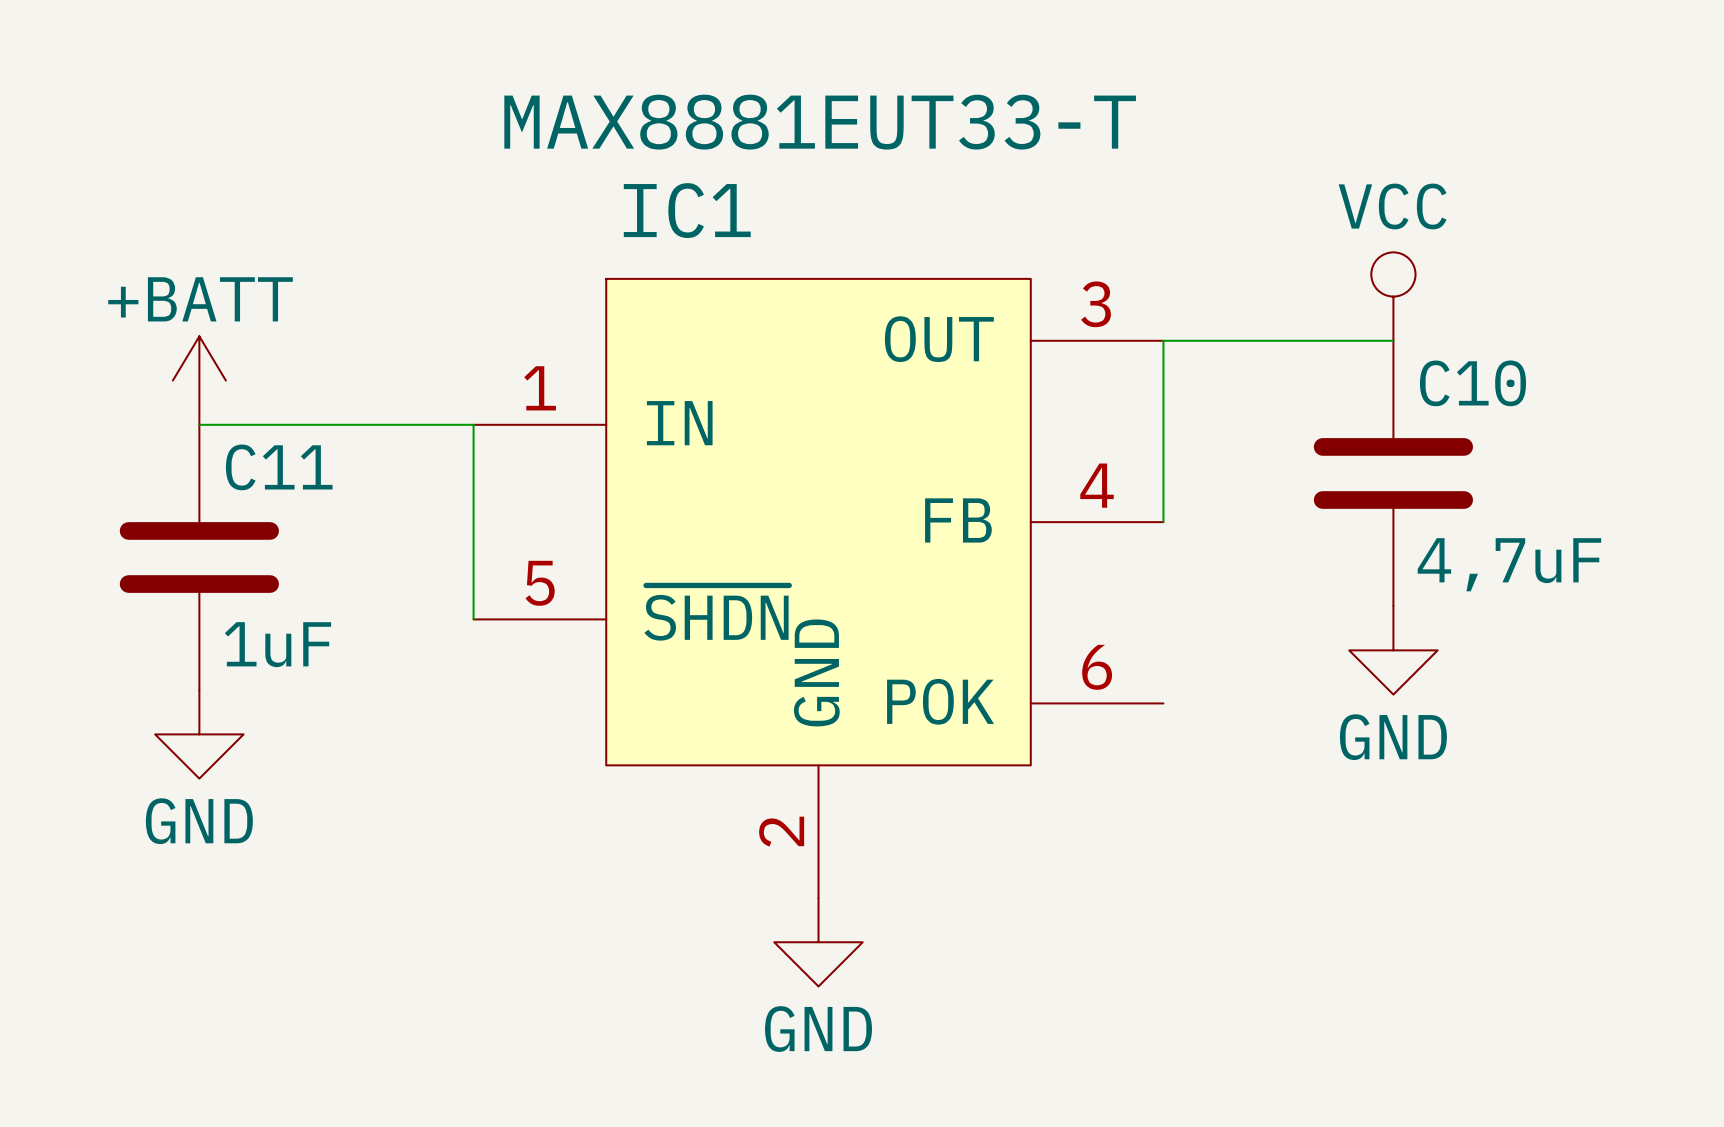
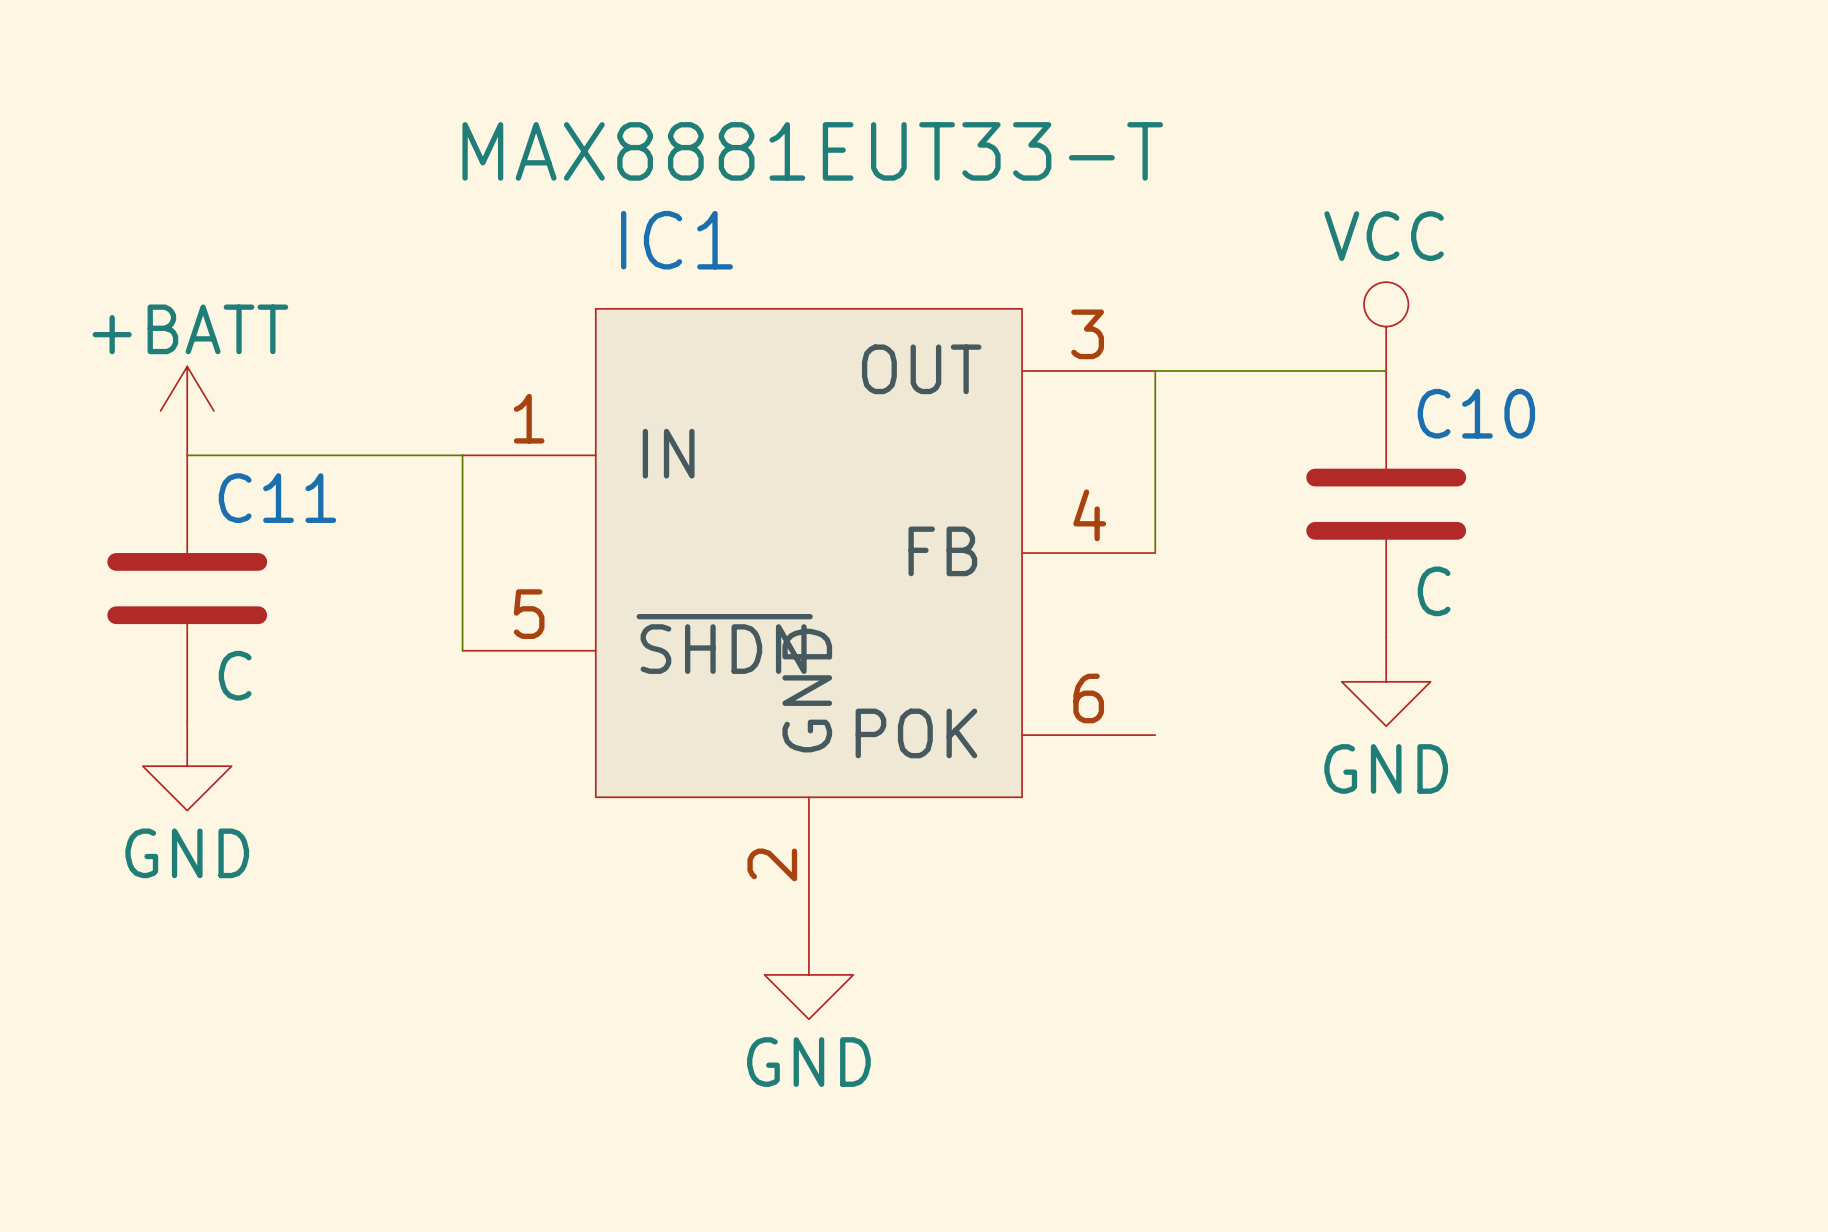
C10 value: 4,7uF (1509, 564) -> C (1434, 591)
C11 value: 1uF (277, 644) -> C (235, 675)

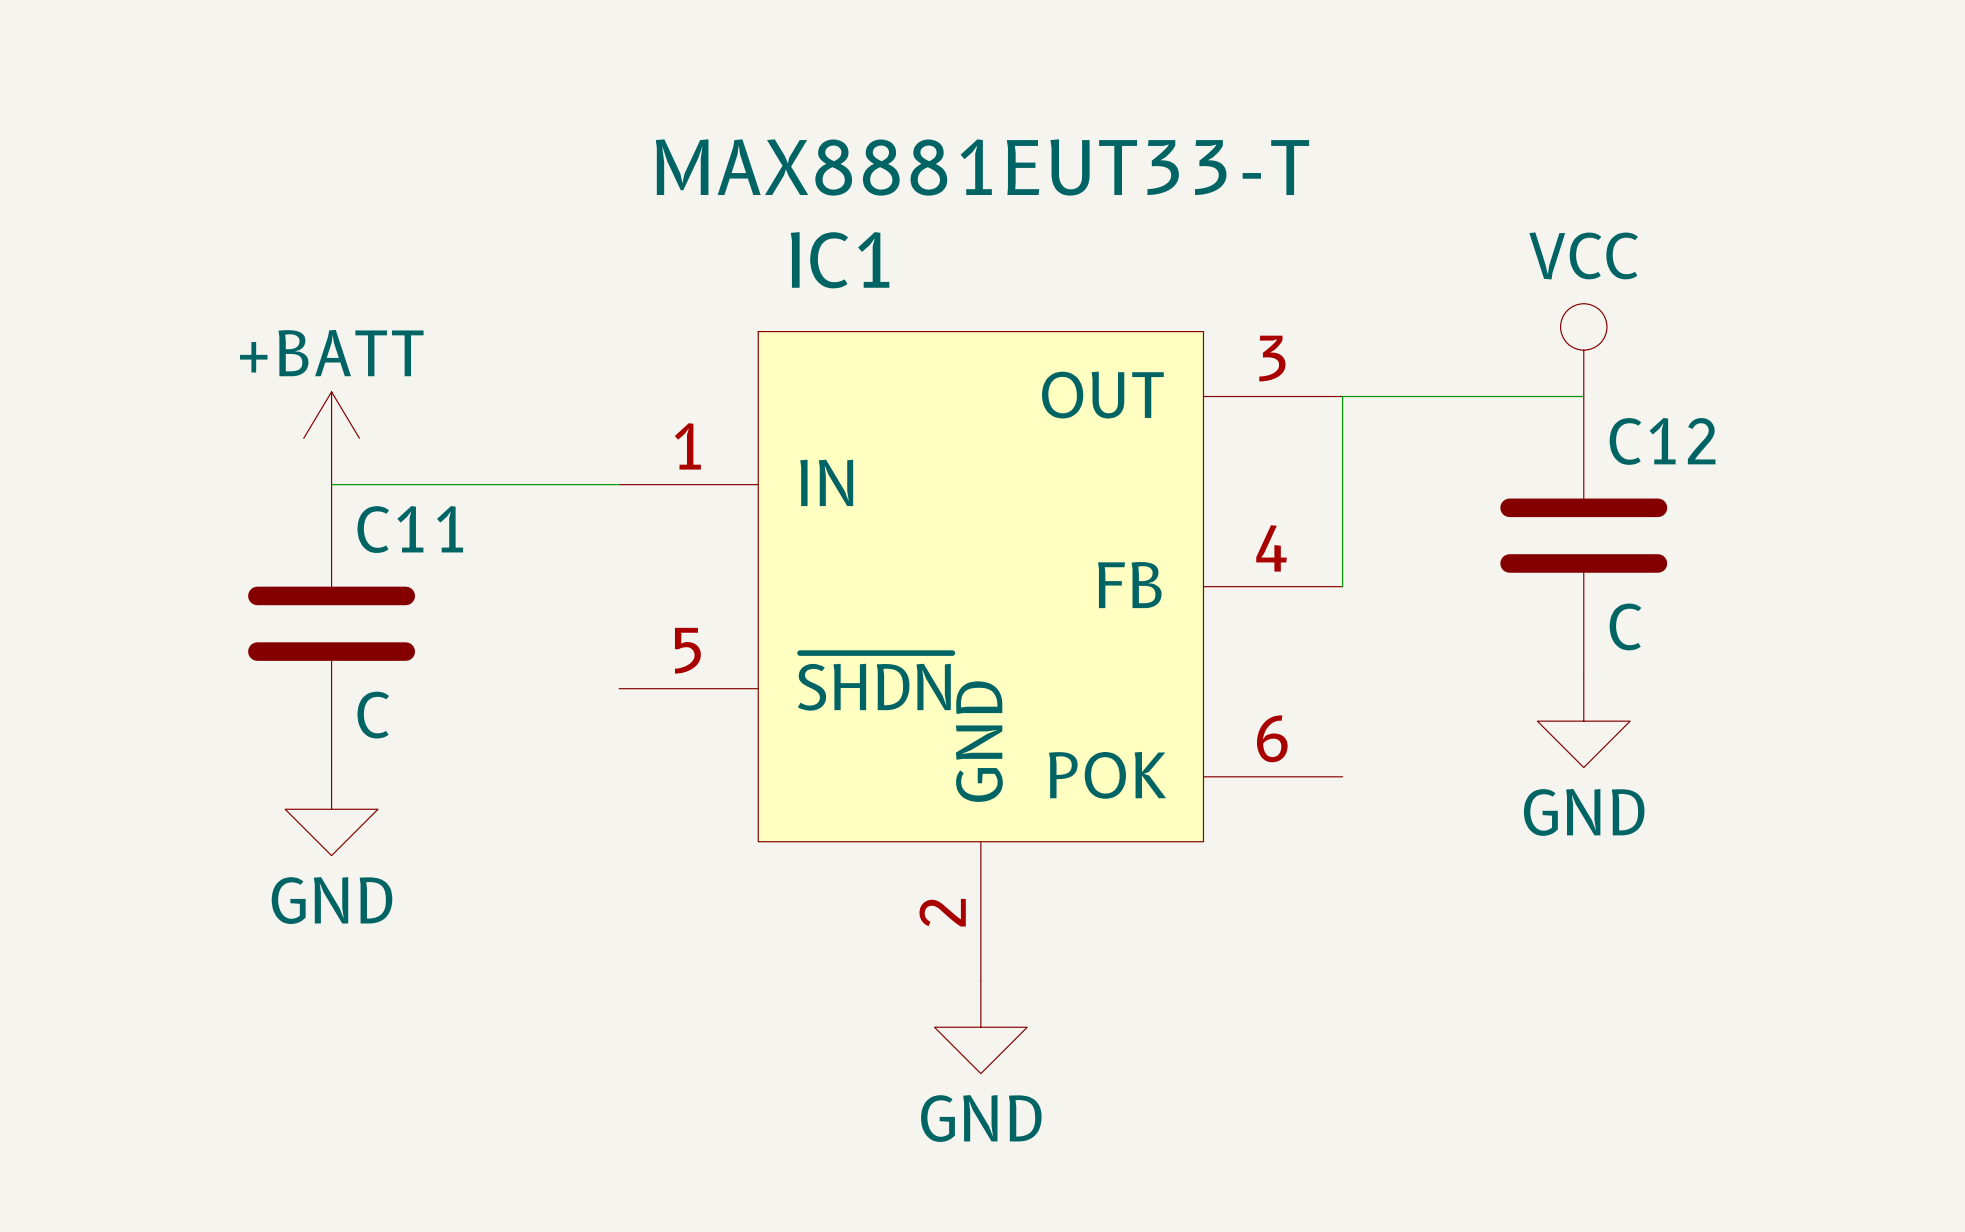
C10 name: C10 (1476, 413) -> C12 (1662, 441)
wire: (462, 455) (462, 650) -> none

